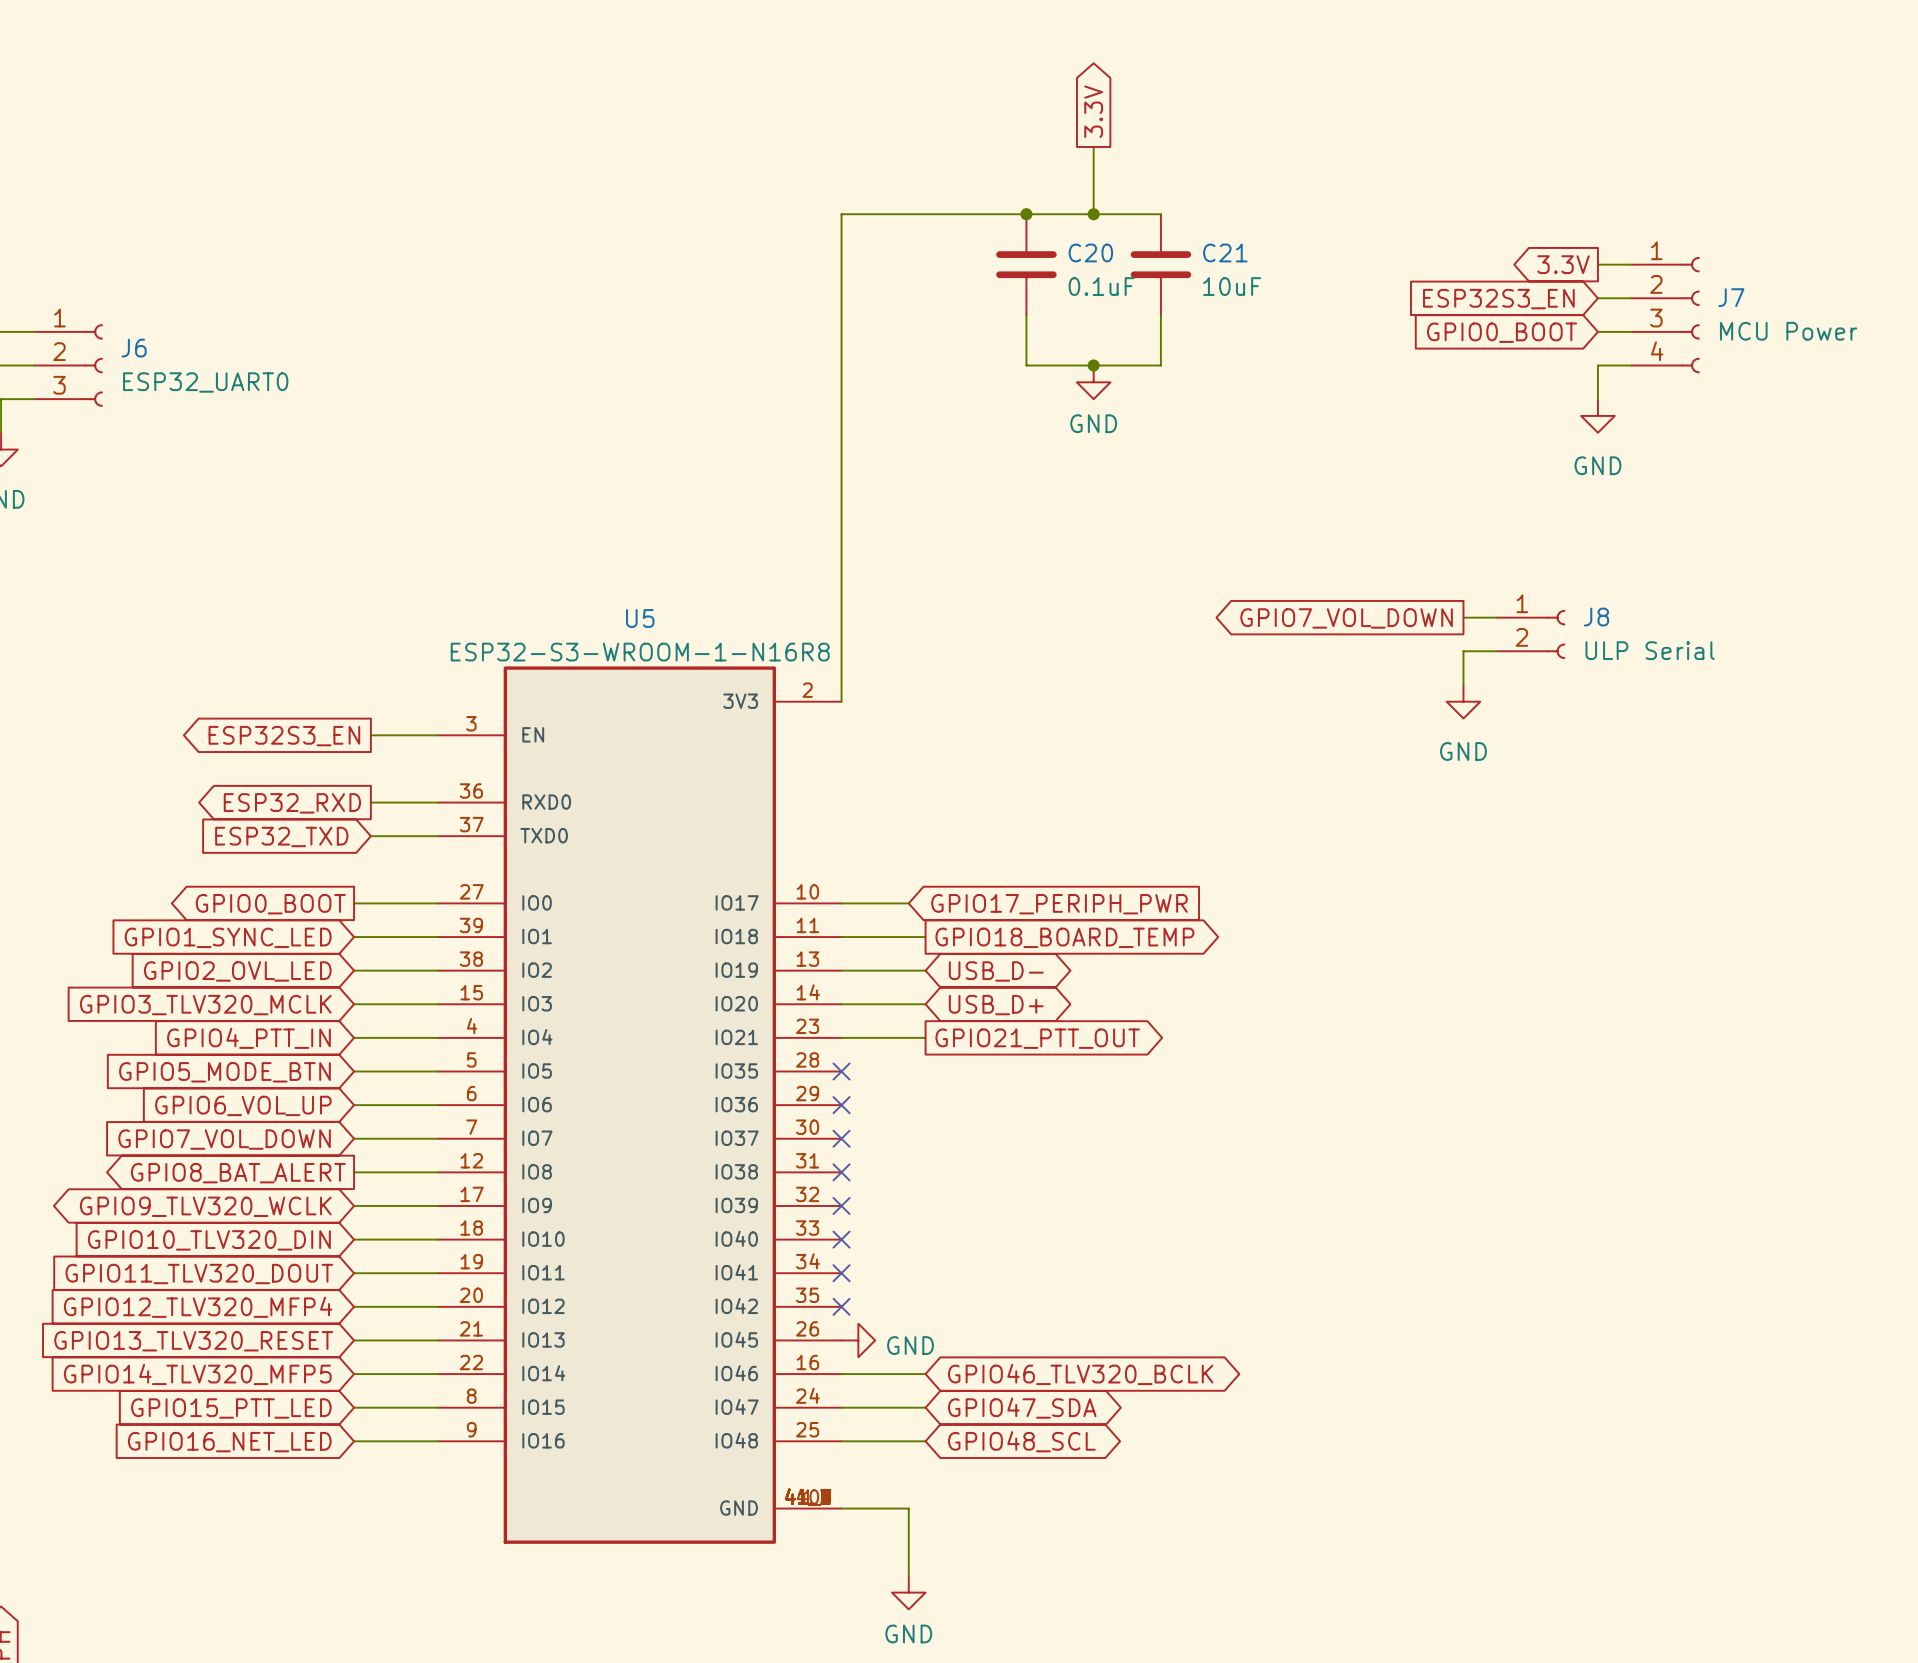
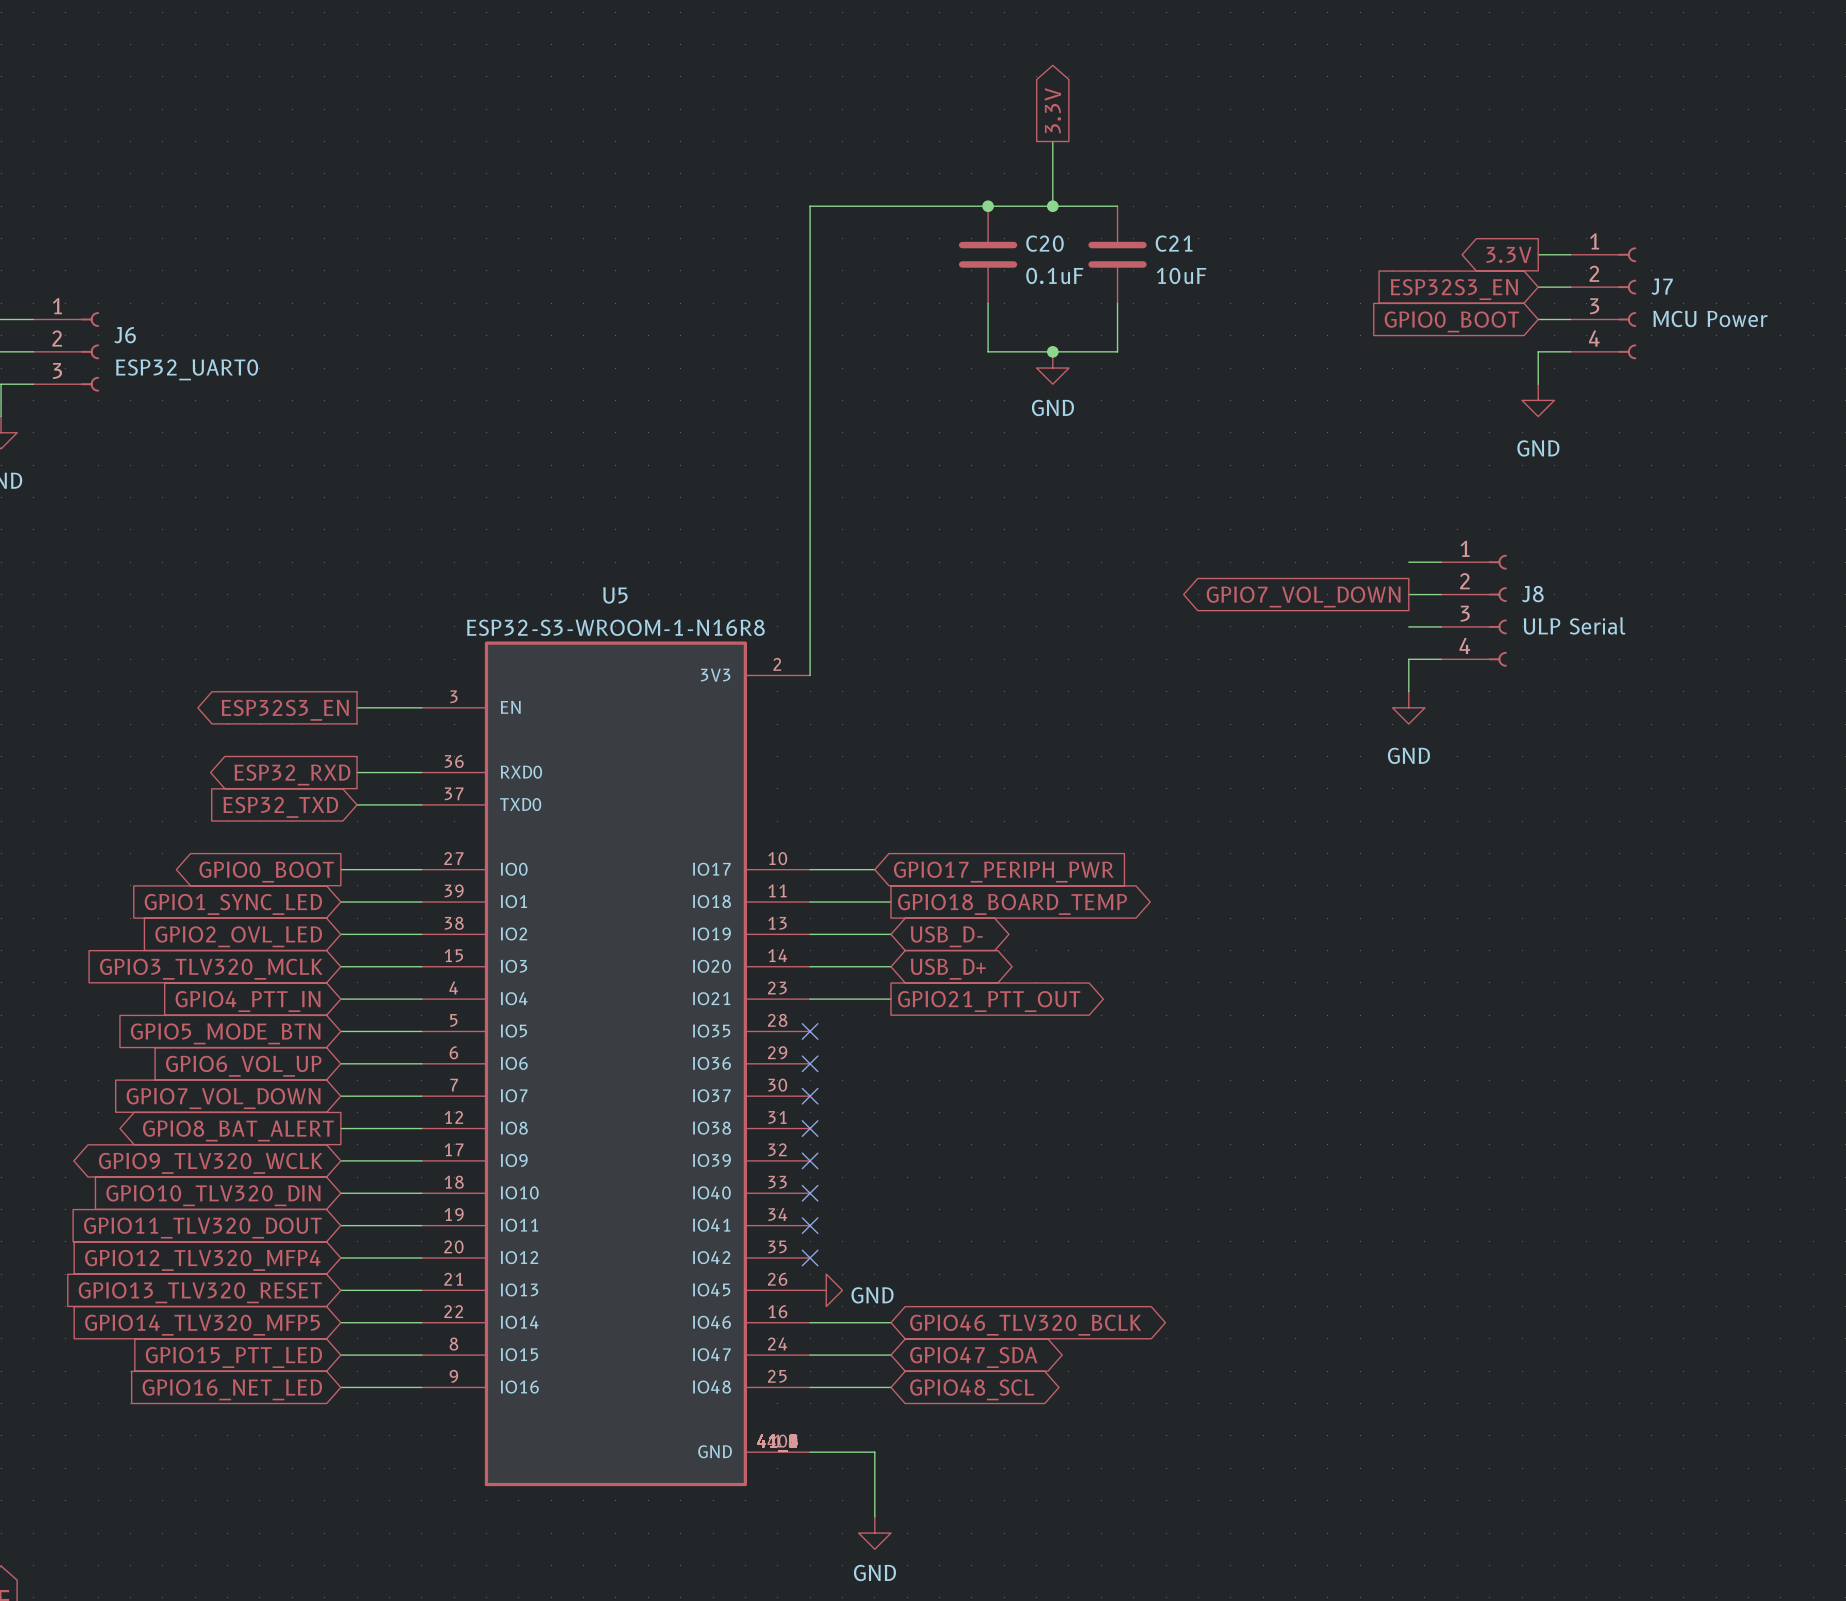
wire: none -> (1408, 562) (1441, 562)
J8 symbol: [1497, 609, 1566, 660] -> [1441, 554, 1507, 667]
wire: (1463, 651) (1463, 684) -> none
wire: none -> (1441, 659) (1408, 659) (1408, 691)
power symbol position: GND (1463, 701) -> GND (1408, 707)

